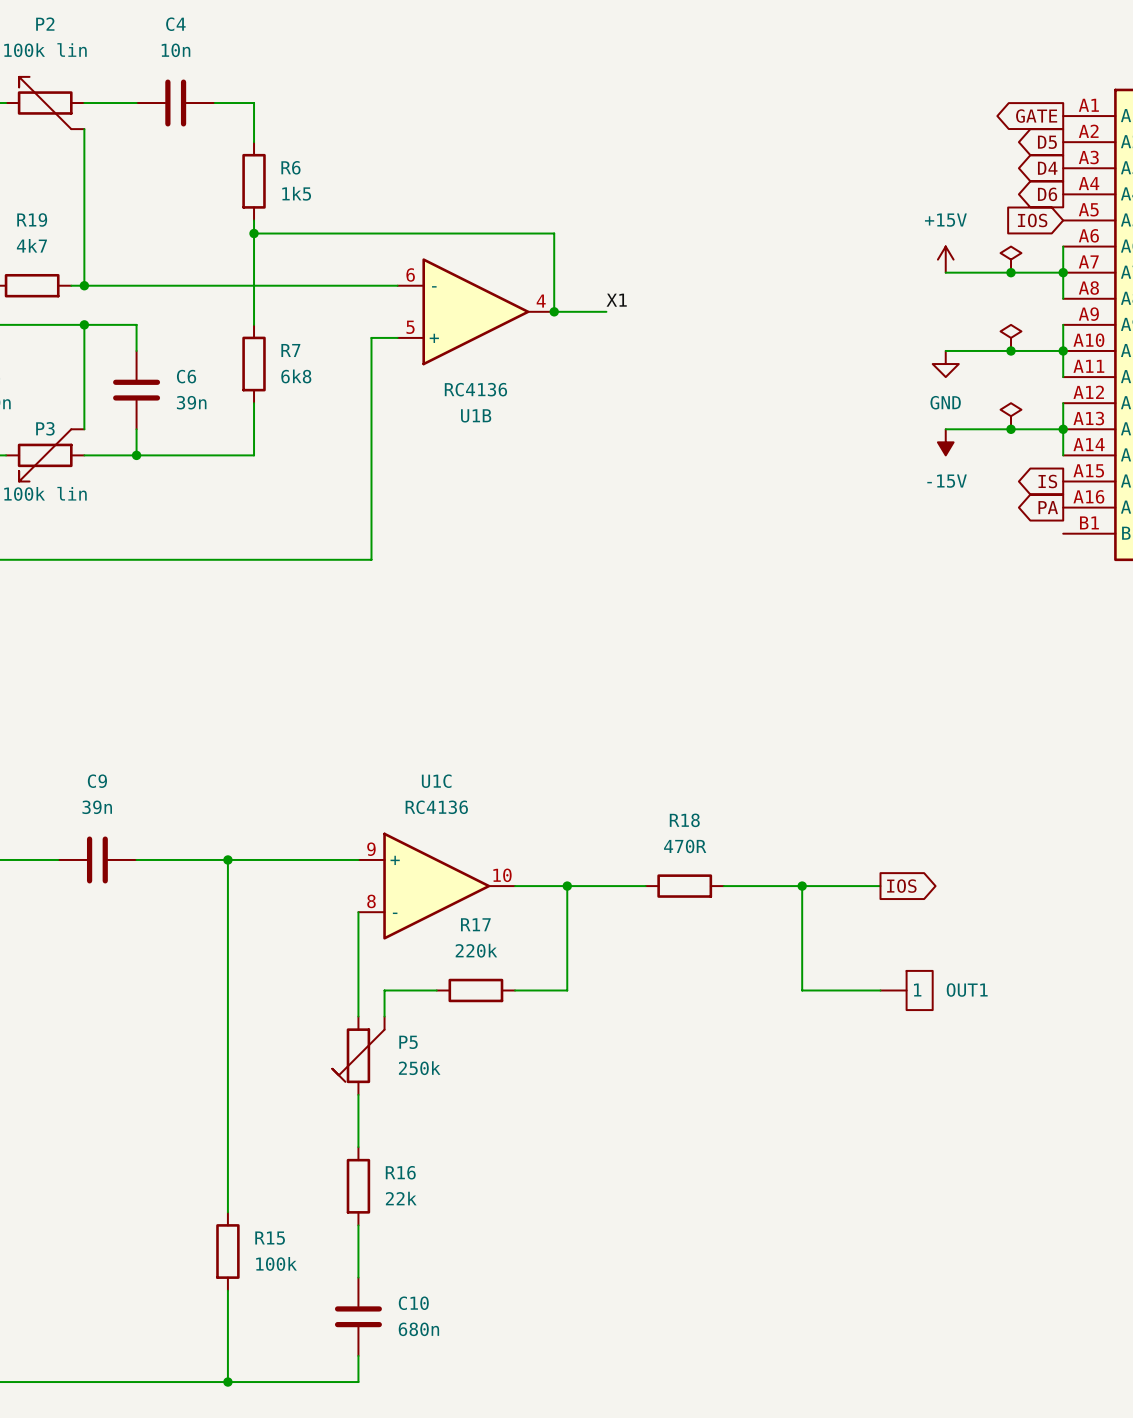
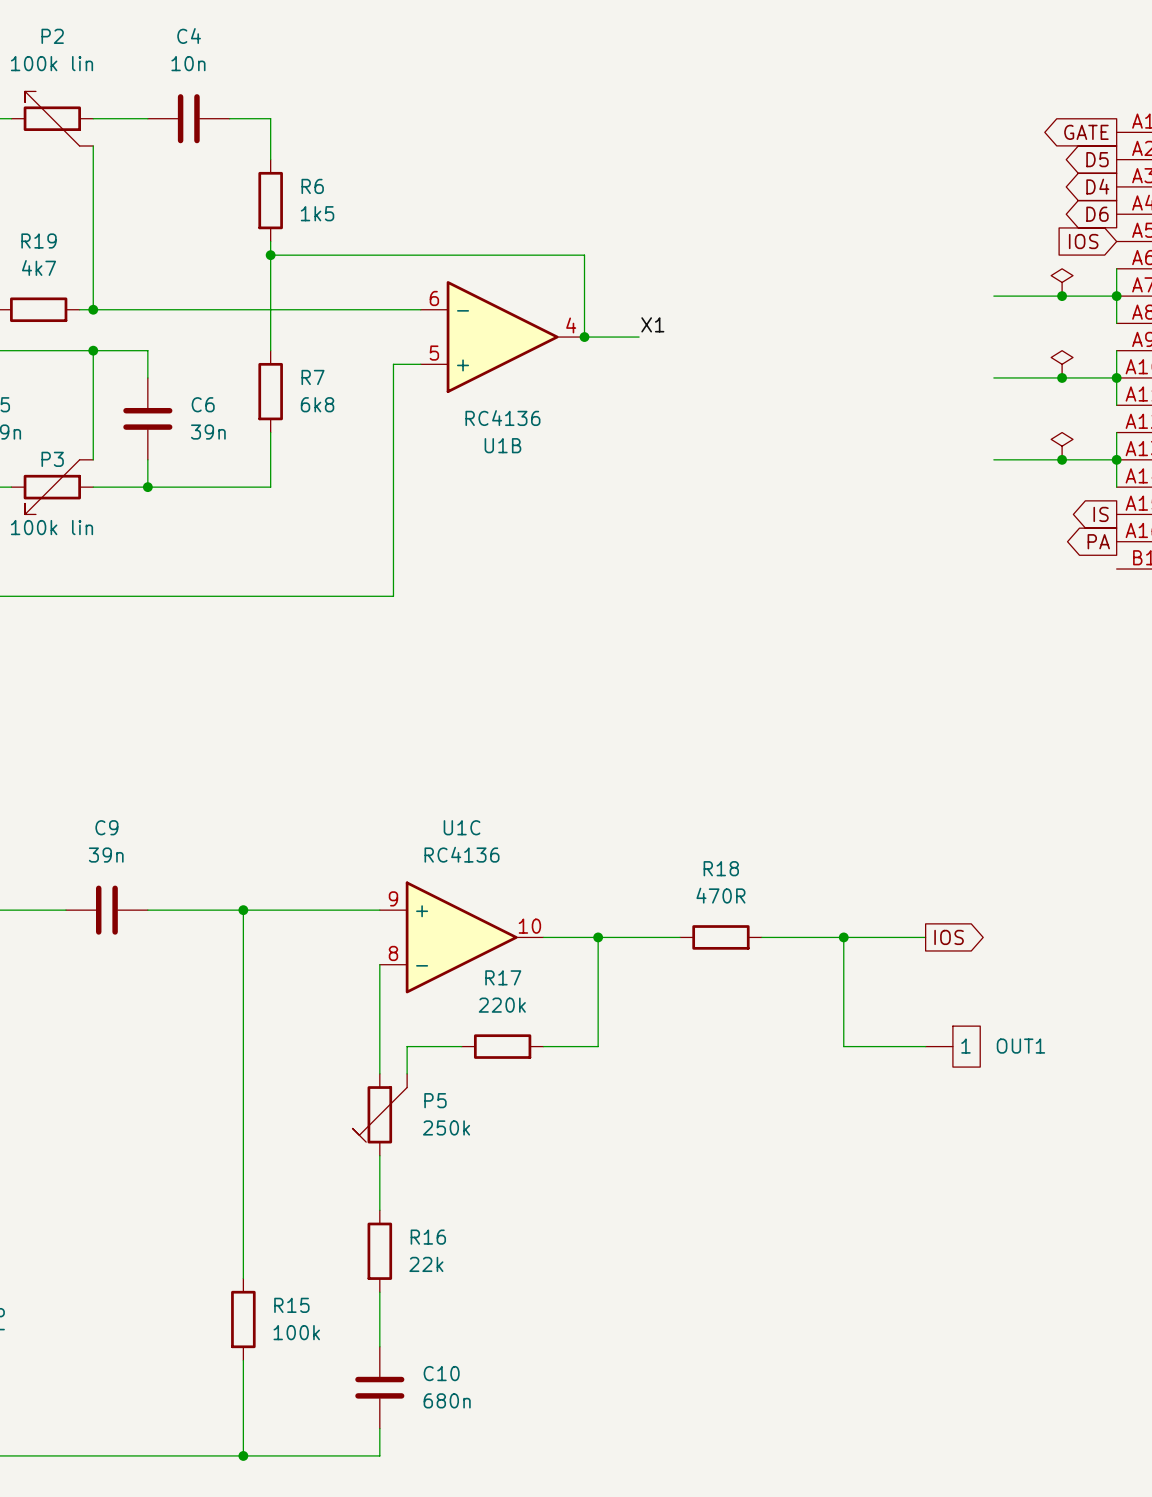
power symbol: +15V (945, 259) -> none
power symbol: GND (945, 364) -> none
power symbol: -15V (945, 442) -> none

